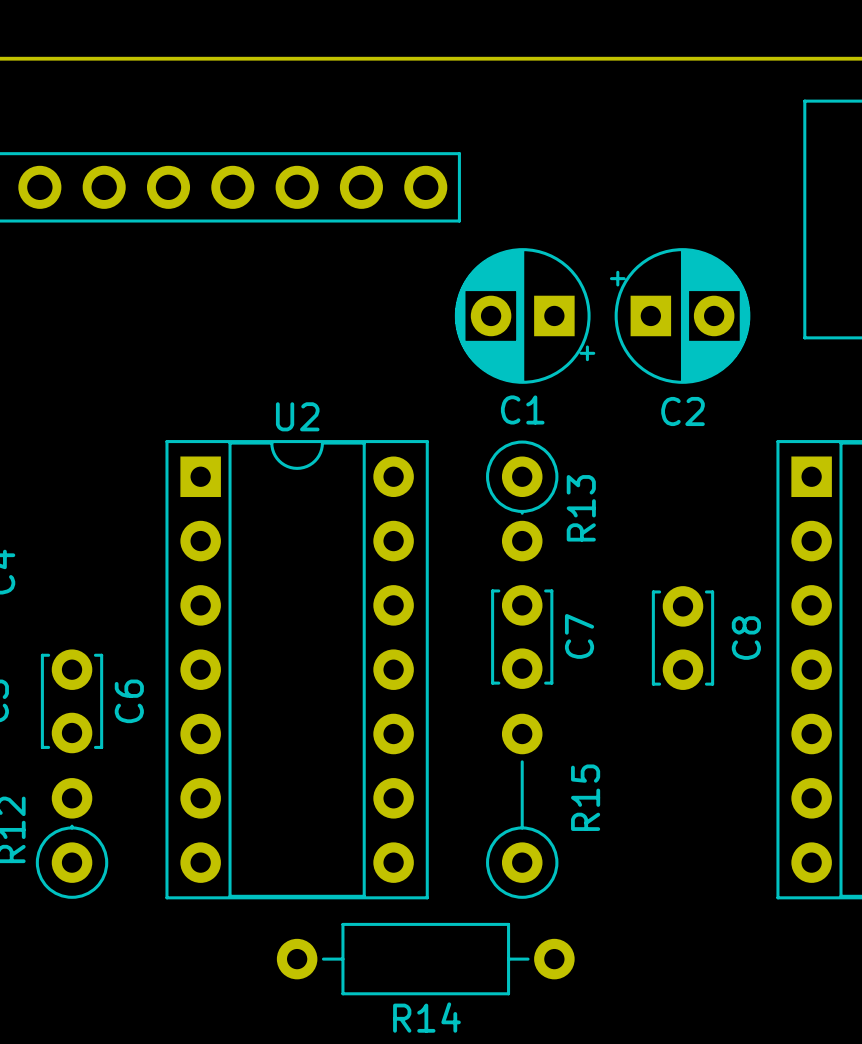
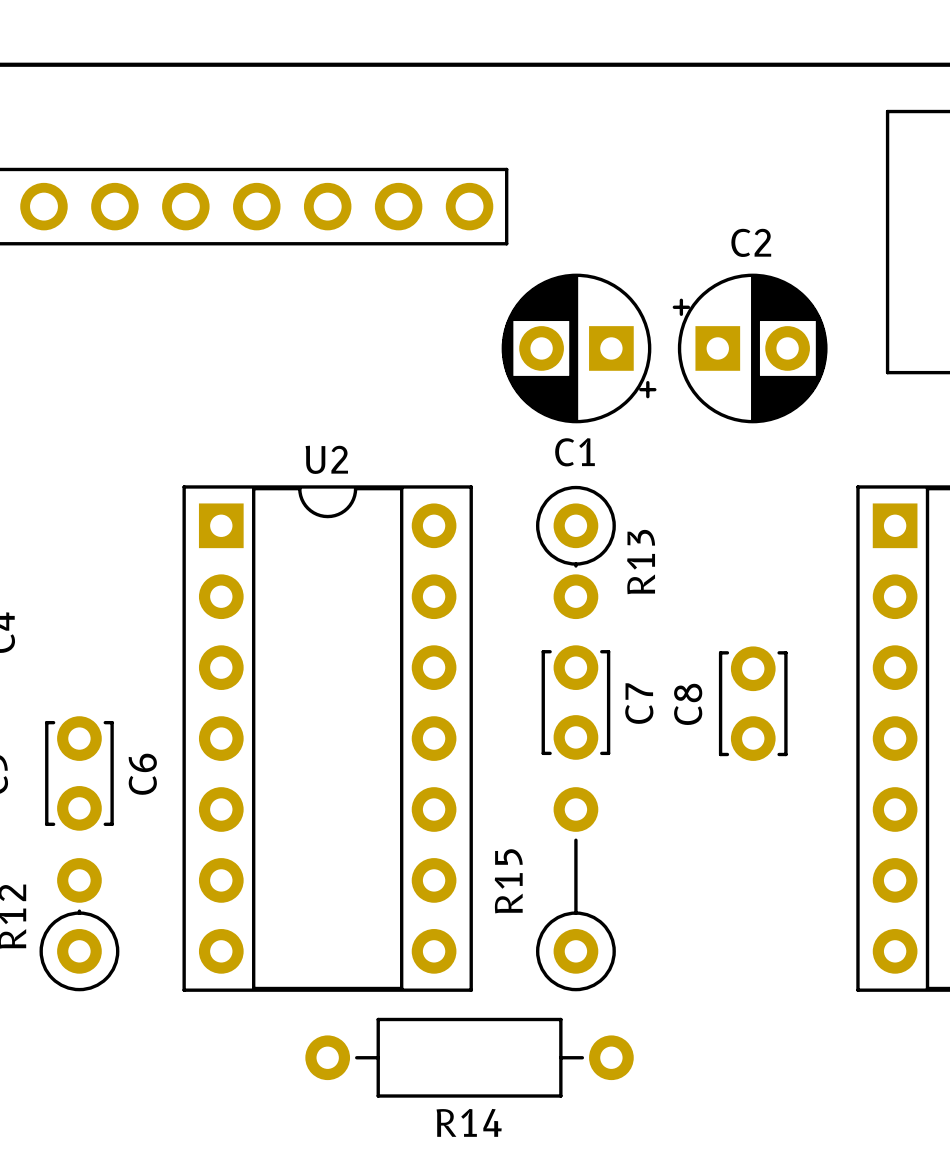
C2 name position: C2 (683, 411) -> C2 (751, 242)
C8 name position: C8 (746, 638) -> C8 (688, 704)
R15 name position: R15 (585, 797) -> R15 (508, 881)

